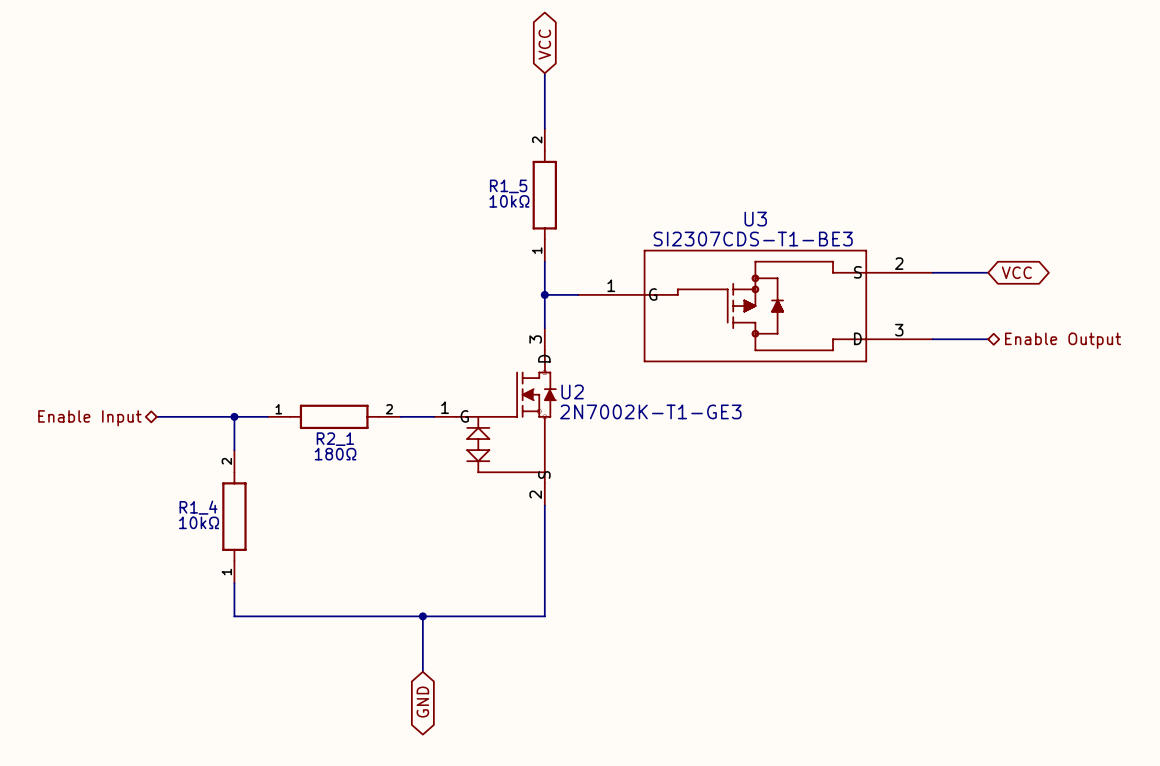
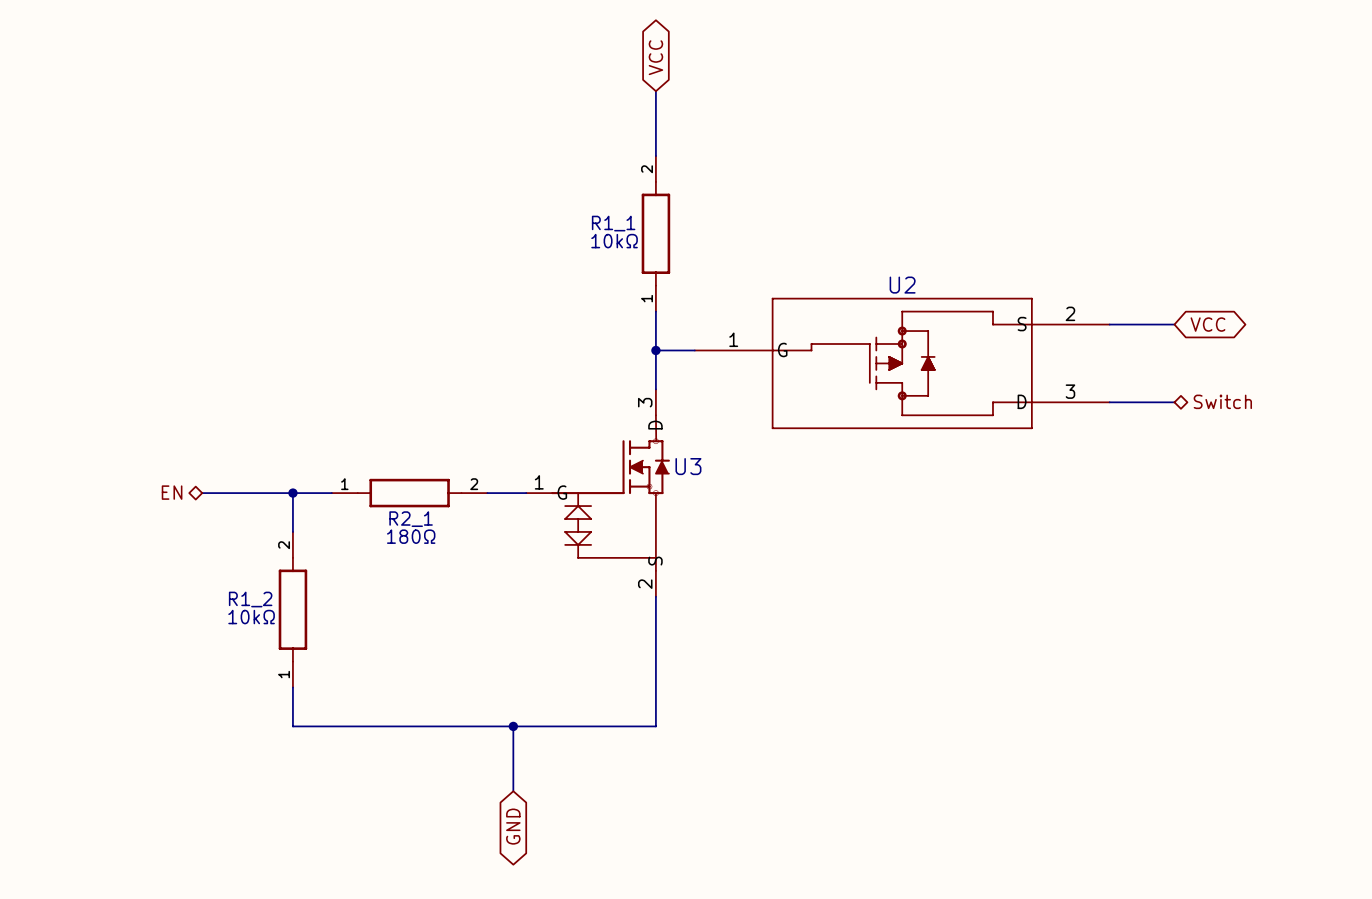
R1_5 name: R1_5 (508, 186) -> R1_1 (613, 223)
U3 name: U3 (755, 219) -> U2 (902, 285)
U3 value: SI2307CDS-T1-BE3 (753, 239) -> none
hierarchical label: Enable Output (1063, 340) -> Switch (1222, 401)
U2 name: U2 (572, 391) -> U3 (688, 466)
U2 value: 2N7002K-T1-GE3 (650, 411) -> none
hierarchical label: Enable Input (89, 418) -> EN (172, 492)
R1_4 name: R1_4 (198, 507) -> R1_2 (250, 599)

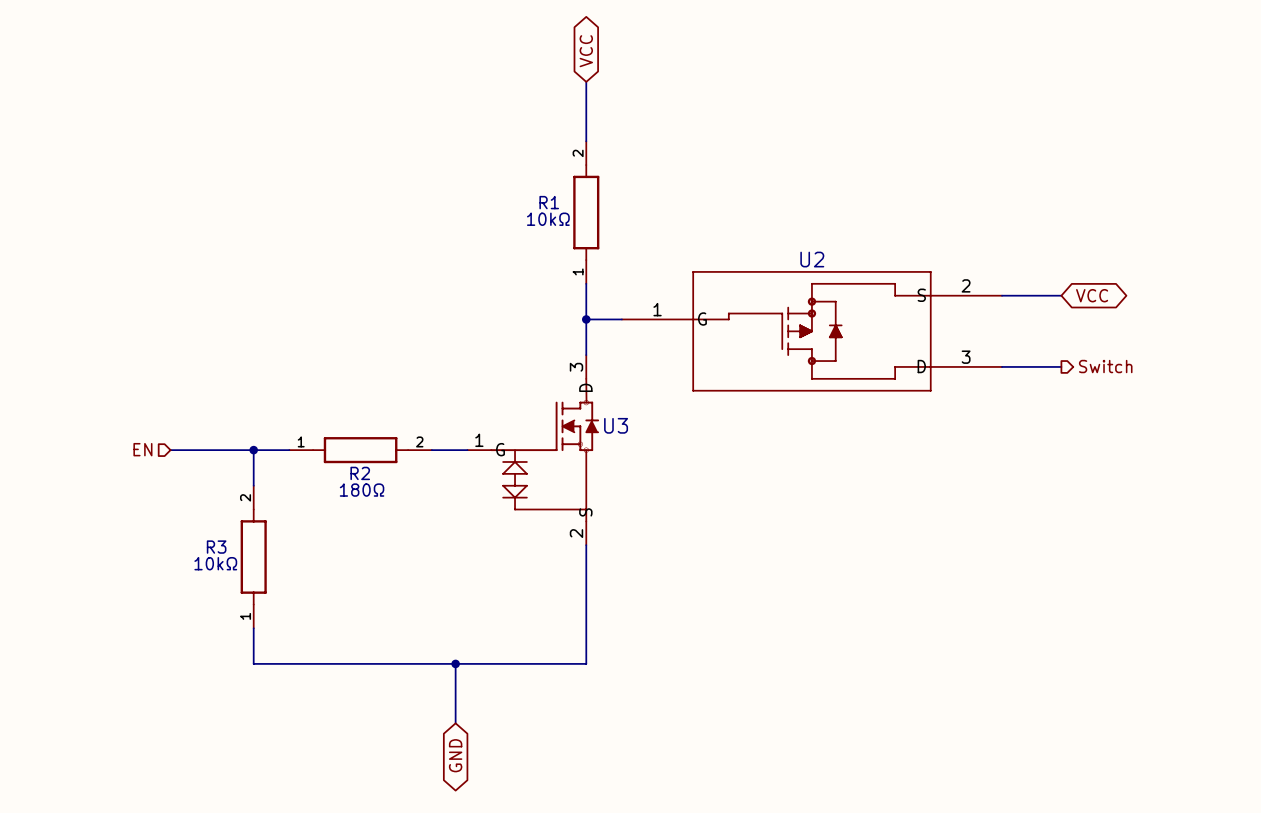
R1_1 name: R1_1 (613, 223) -> R1 (549, 202)
hierarchical label shape: bidirectional (1222, 401) -> output (1105, 366)
hierarchical label shape: bidirectional (172, 492) -> input (142, 449)
R2_1 name: R2_1 (411, 519) -> R2 (360, 473)
R1_2 name: R1_2 (250, 599) -> R3 (216, 547)

